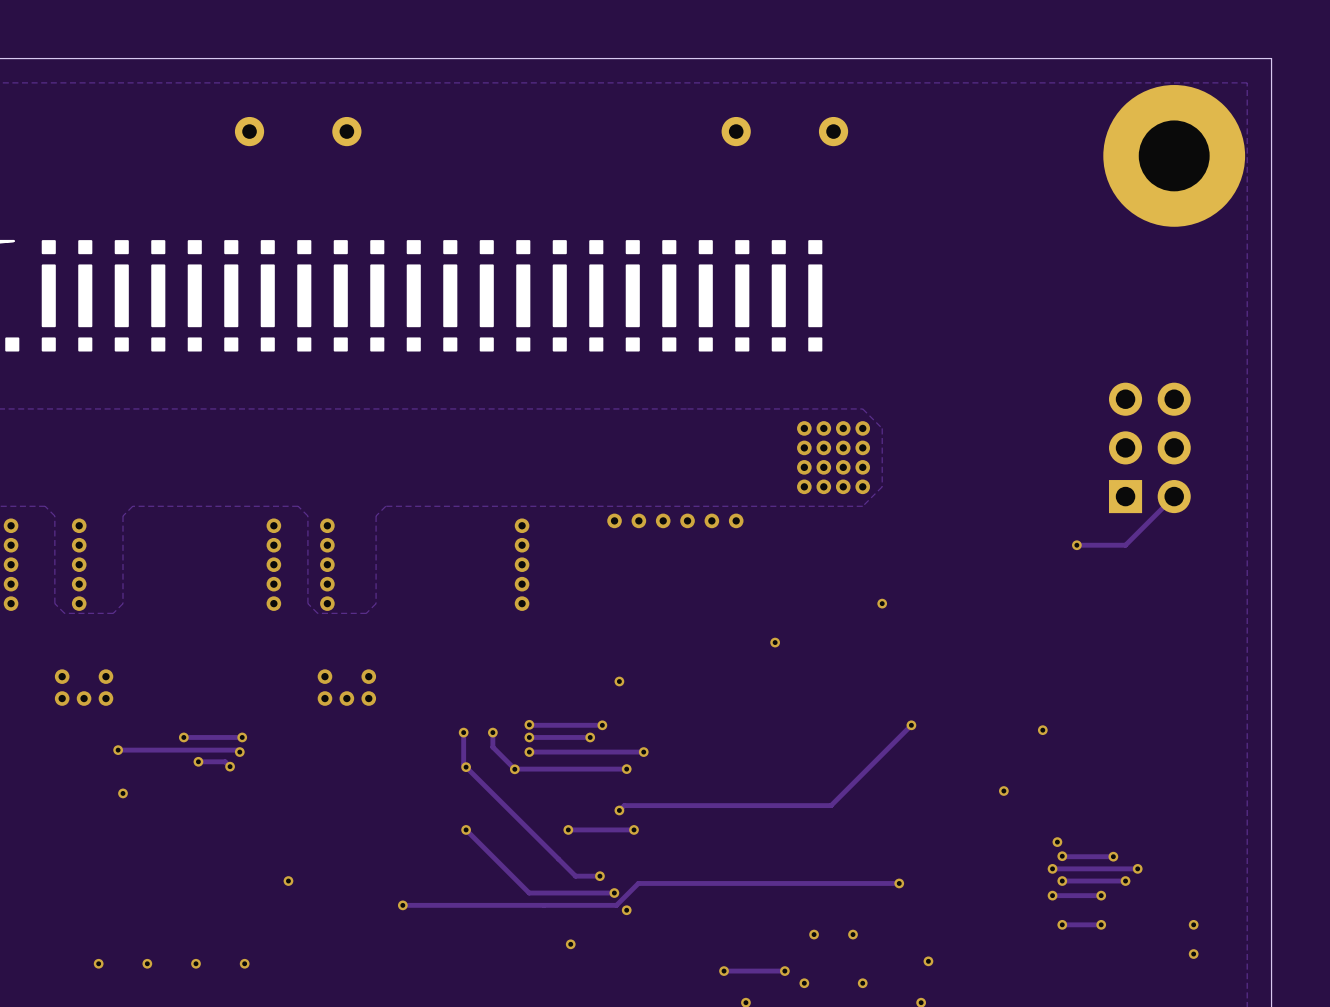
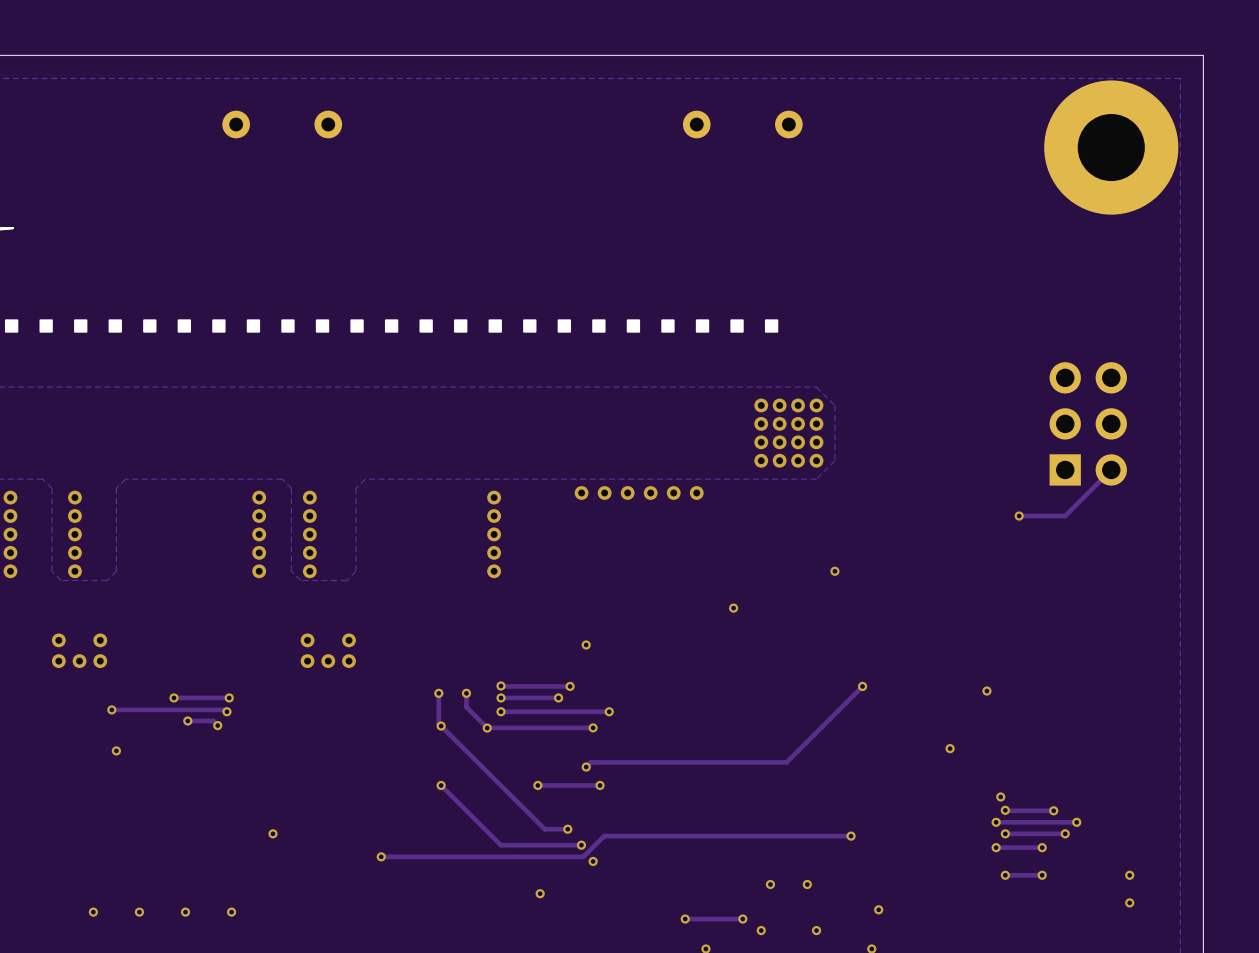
drawing: [41, 240, 823, 328] -> none

